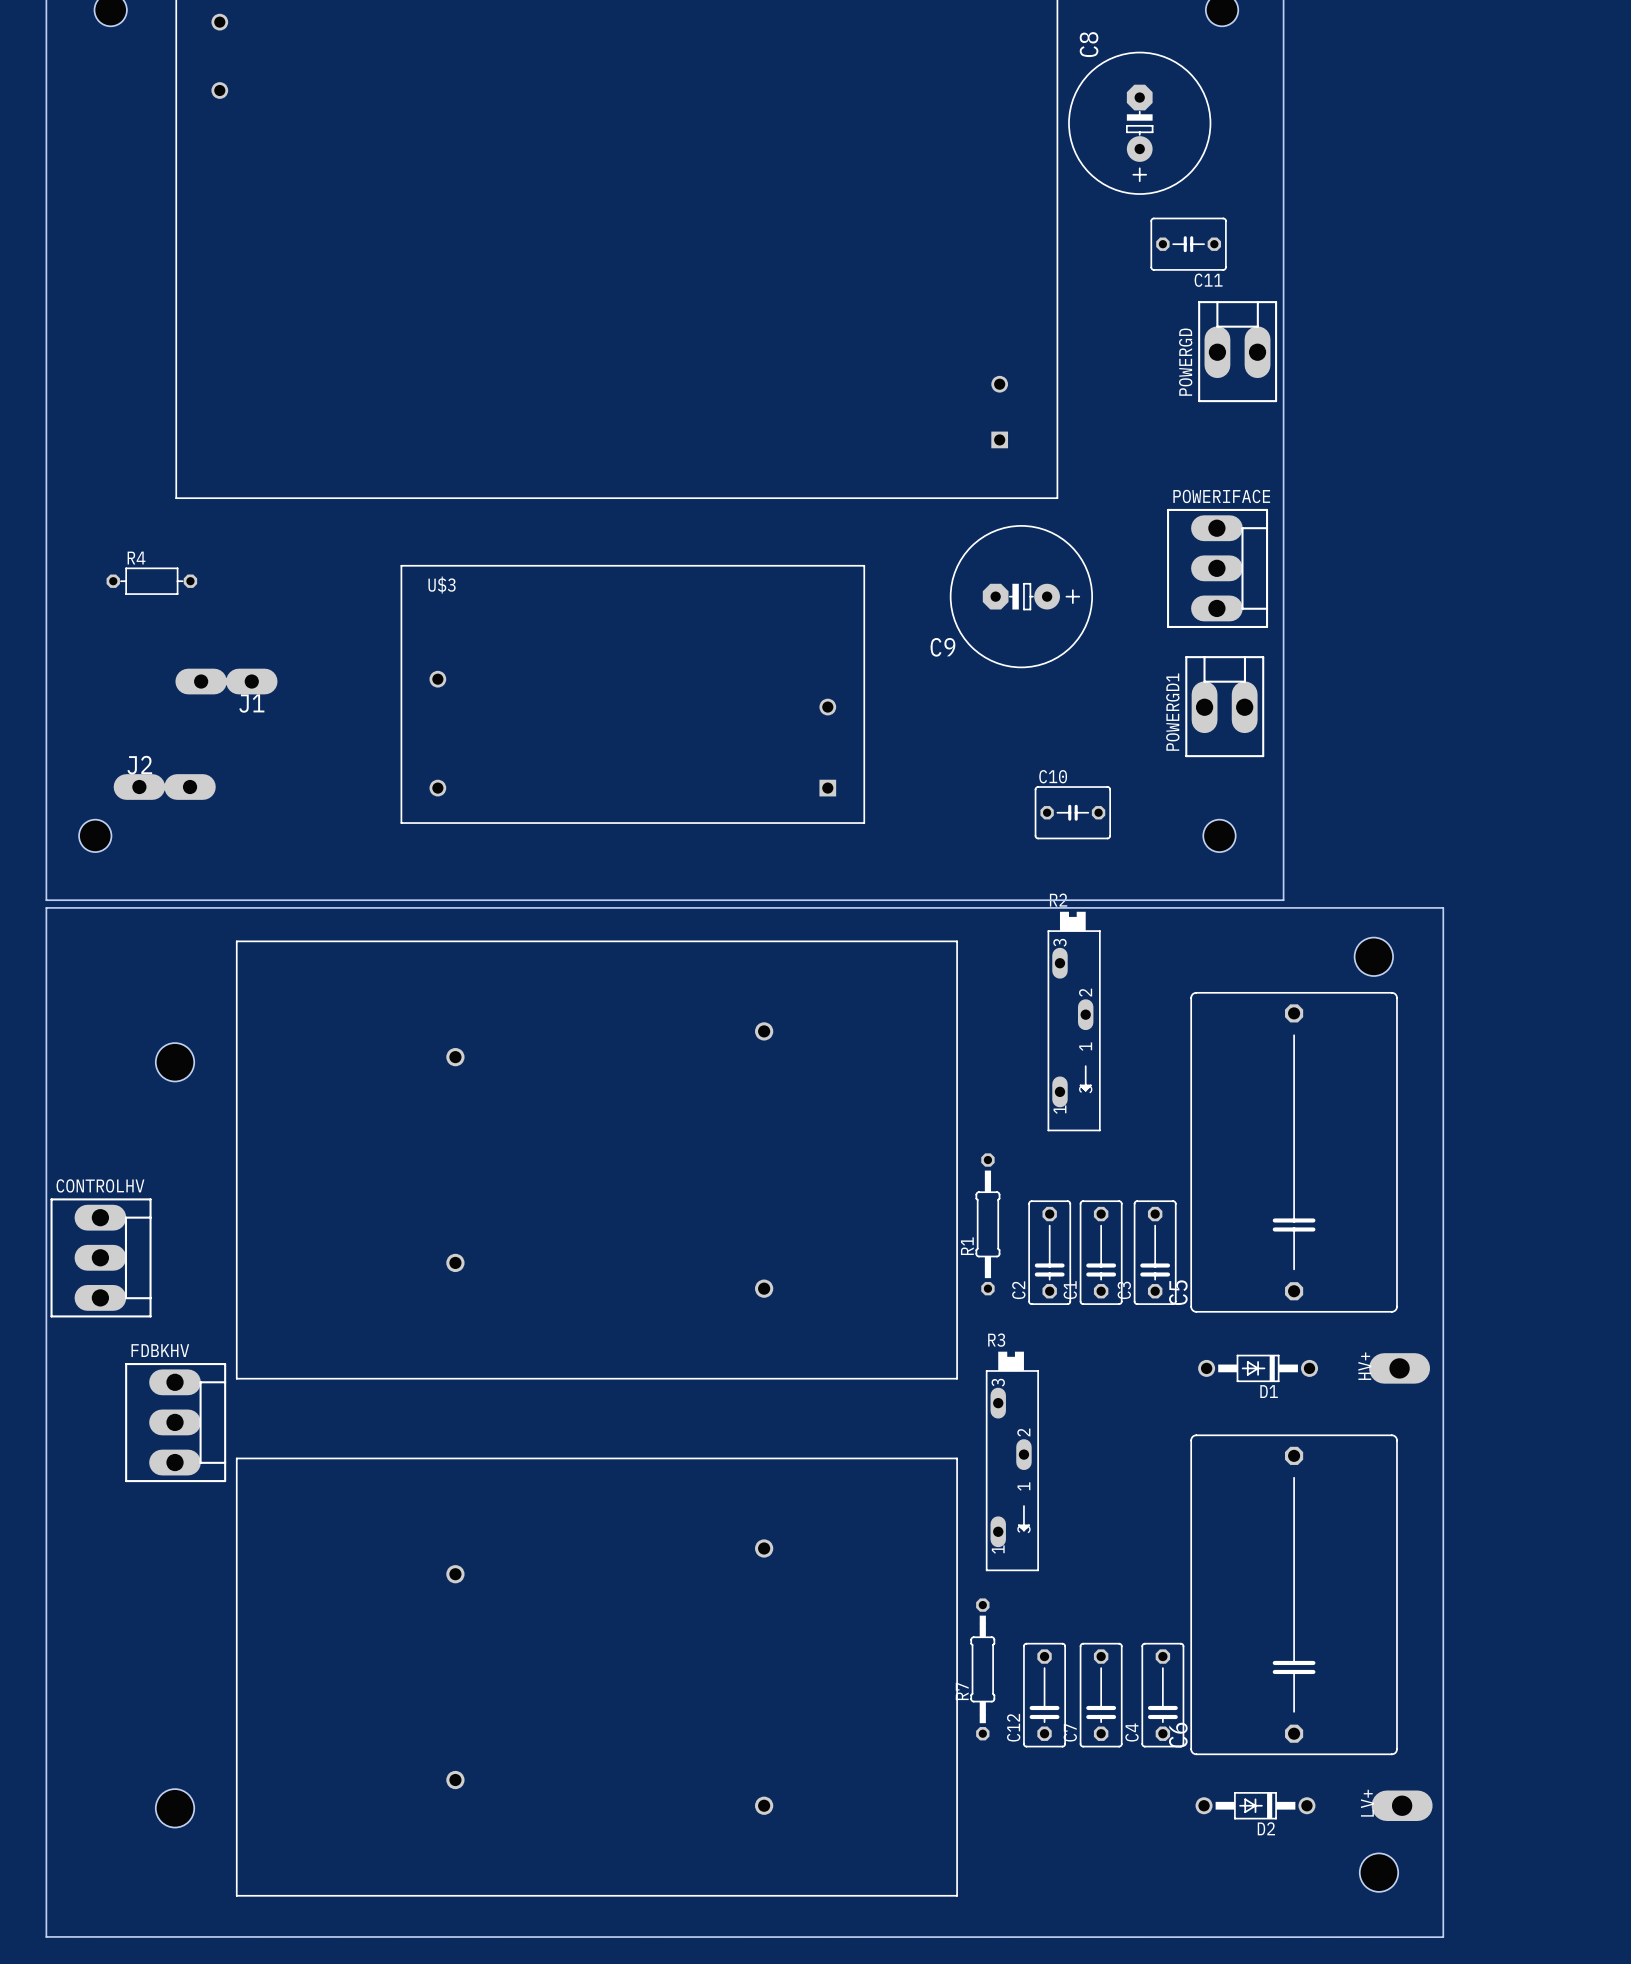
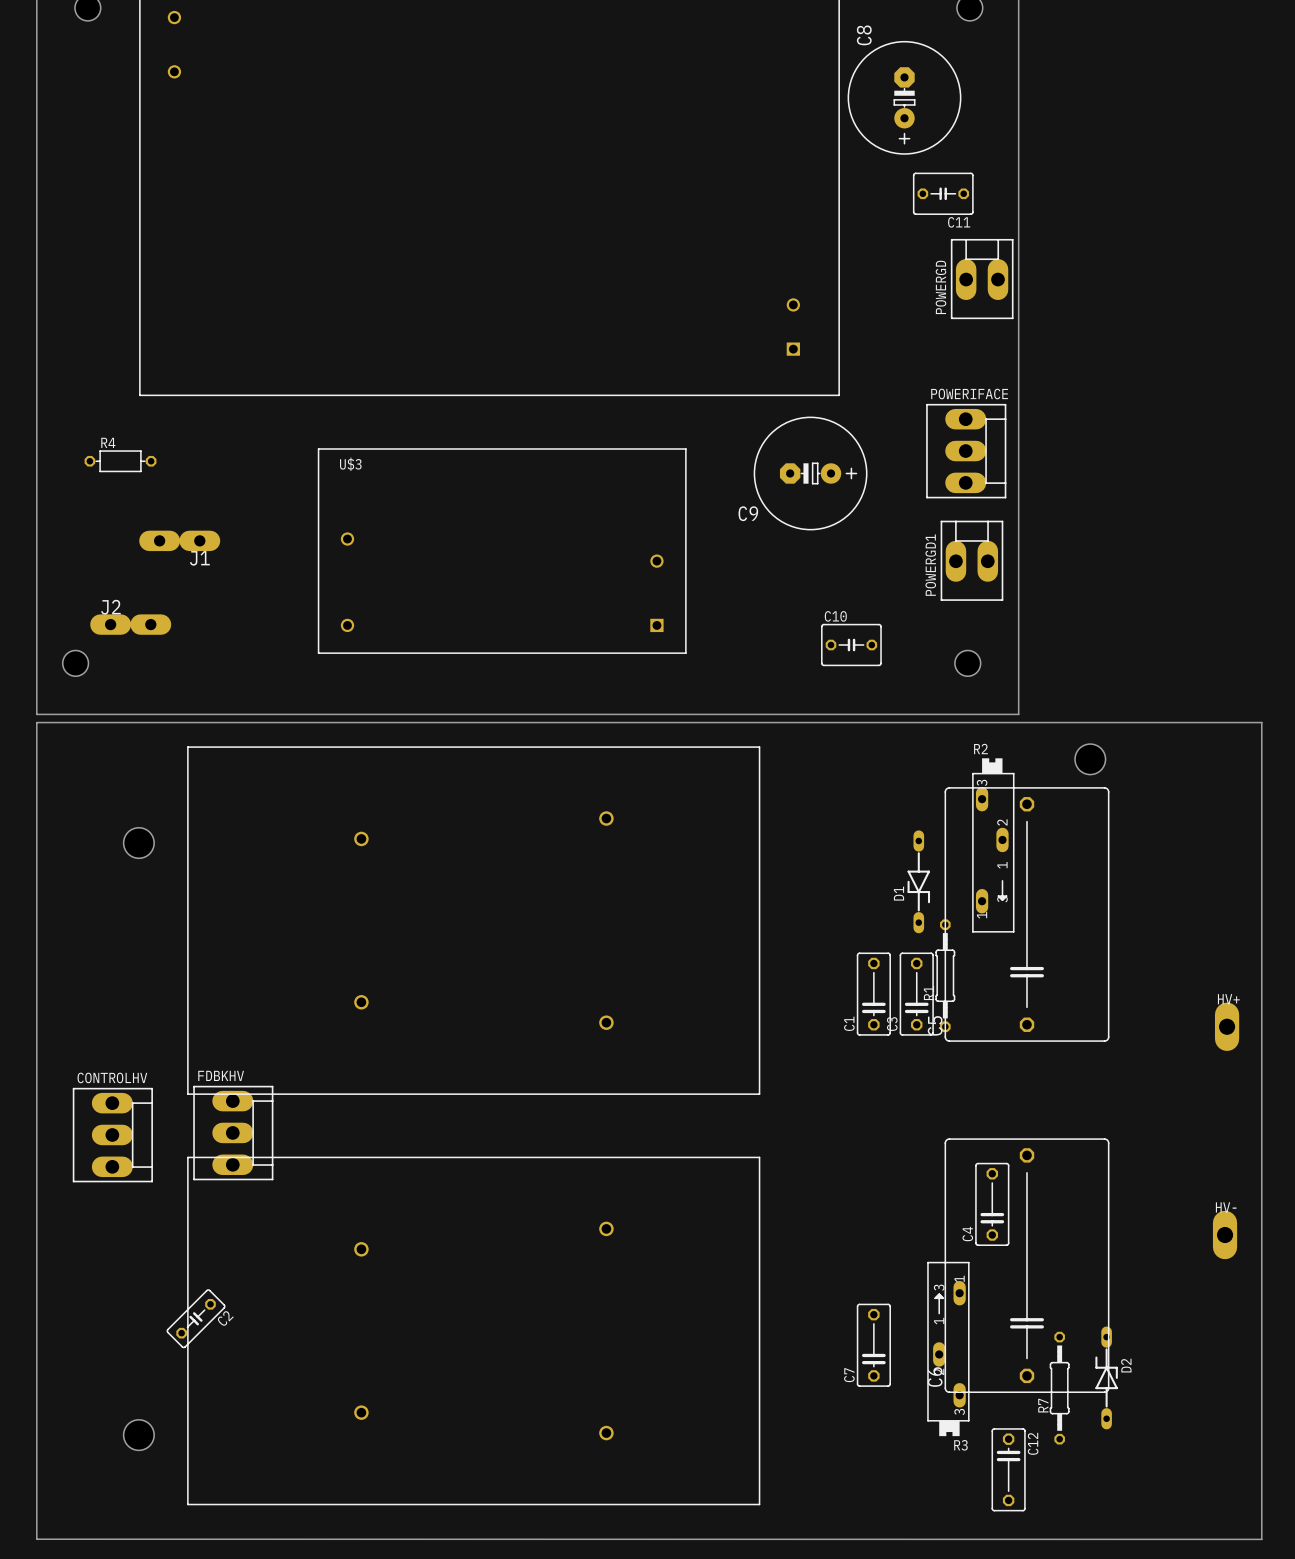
board edge: (46, 910) (46, 907) (1443, 907) (1443, 1937) (46, 1936) -> (36, 722) (1261, 722) (1261, 1539) (36, 1539) (36, 1537)
R2 position: (1074, 1021) -> (993, 845)
C2 footprint: [1028, 1200, 1072, 1305] -> [166, 1289, 226, 1349]
R1 position: (987, 1224) -> (945, 975)
CONTROLHV position: (101, 1257) -> (112, 1135)
C2 name position: C2 (1018, 1290) -> C2 (225, 1318)
R3 name position: R3 (996, 1340) -> R3 (960, 1445)
R3 footprint: [985, 1351, 1039, 1572] -> [927, 1261, 970, 1437]
D1 footprint: [1198, 1354, 1319, 1383] -> [907, 830, 931, 934]
HV+ rotation: 0° (1399, 1368) -> 90° clockwise (1227, 1026)
HV+ position: (1399, 1368) -> (1227, 1026)
D1 name position: D1 (1269, 1391) -> D1 (898, 893)
FDBKHV position: (175, 1422) -> (233, 1133)
HV-: none -> (1225, 1235)
R7 position: (982, 1669) -> (1059, 1388)
C12 rotation: 0° (1044, 1695) -> 180° (1008, 1469)
C12 position: (1044, 1695) -> (1008, 1469)
C4 position: (1162, 1695) -> (992, 1204)
D2 footprint: [1195, 1792, 1316, 1820] -> [1095, 1326, 1118, 1430]
LV+: (1402, 1805) -> none
D2 name position: D2 (1266, 1828) -> D2 (1126, 1365)
hole: (1378, 1872) -> none

